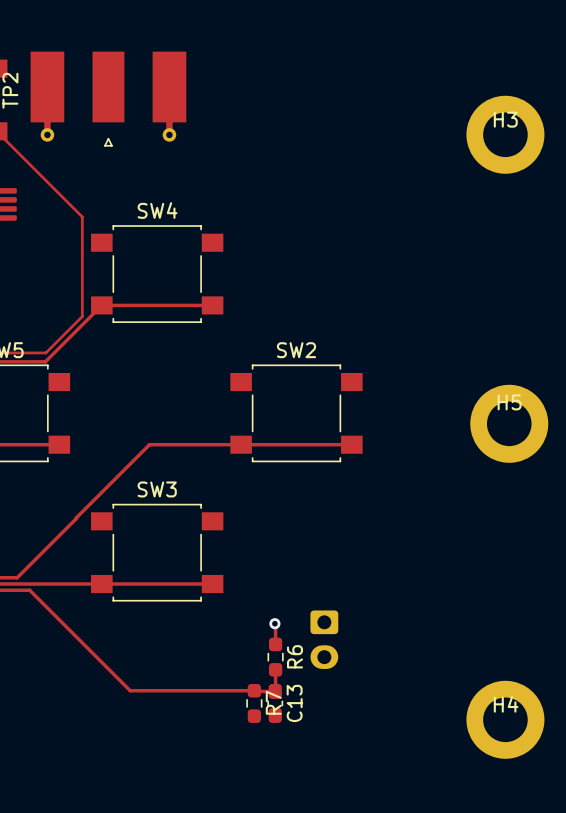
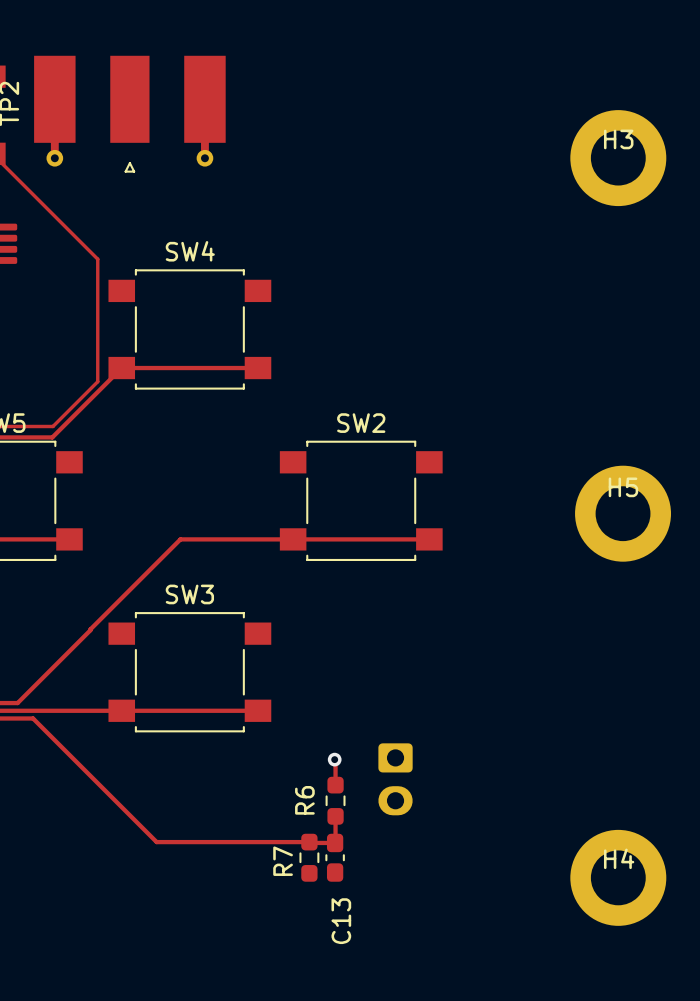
R6 name position: R6 (295, 656) -> R6 (304, 800)
R7 name position: R7 (273, 702) -> R7 (283, 861)
C13 name position: C13 (294, 703) -> C13 (341, 921)

